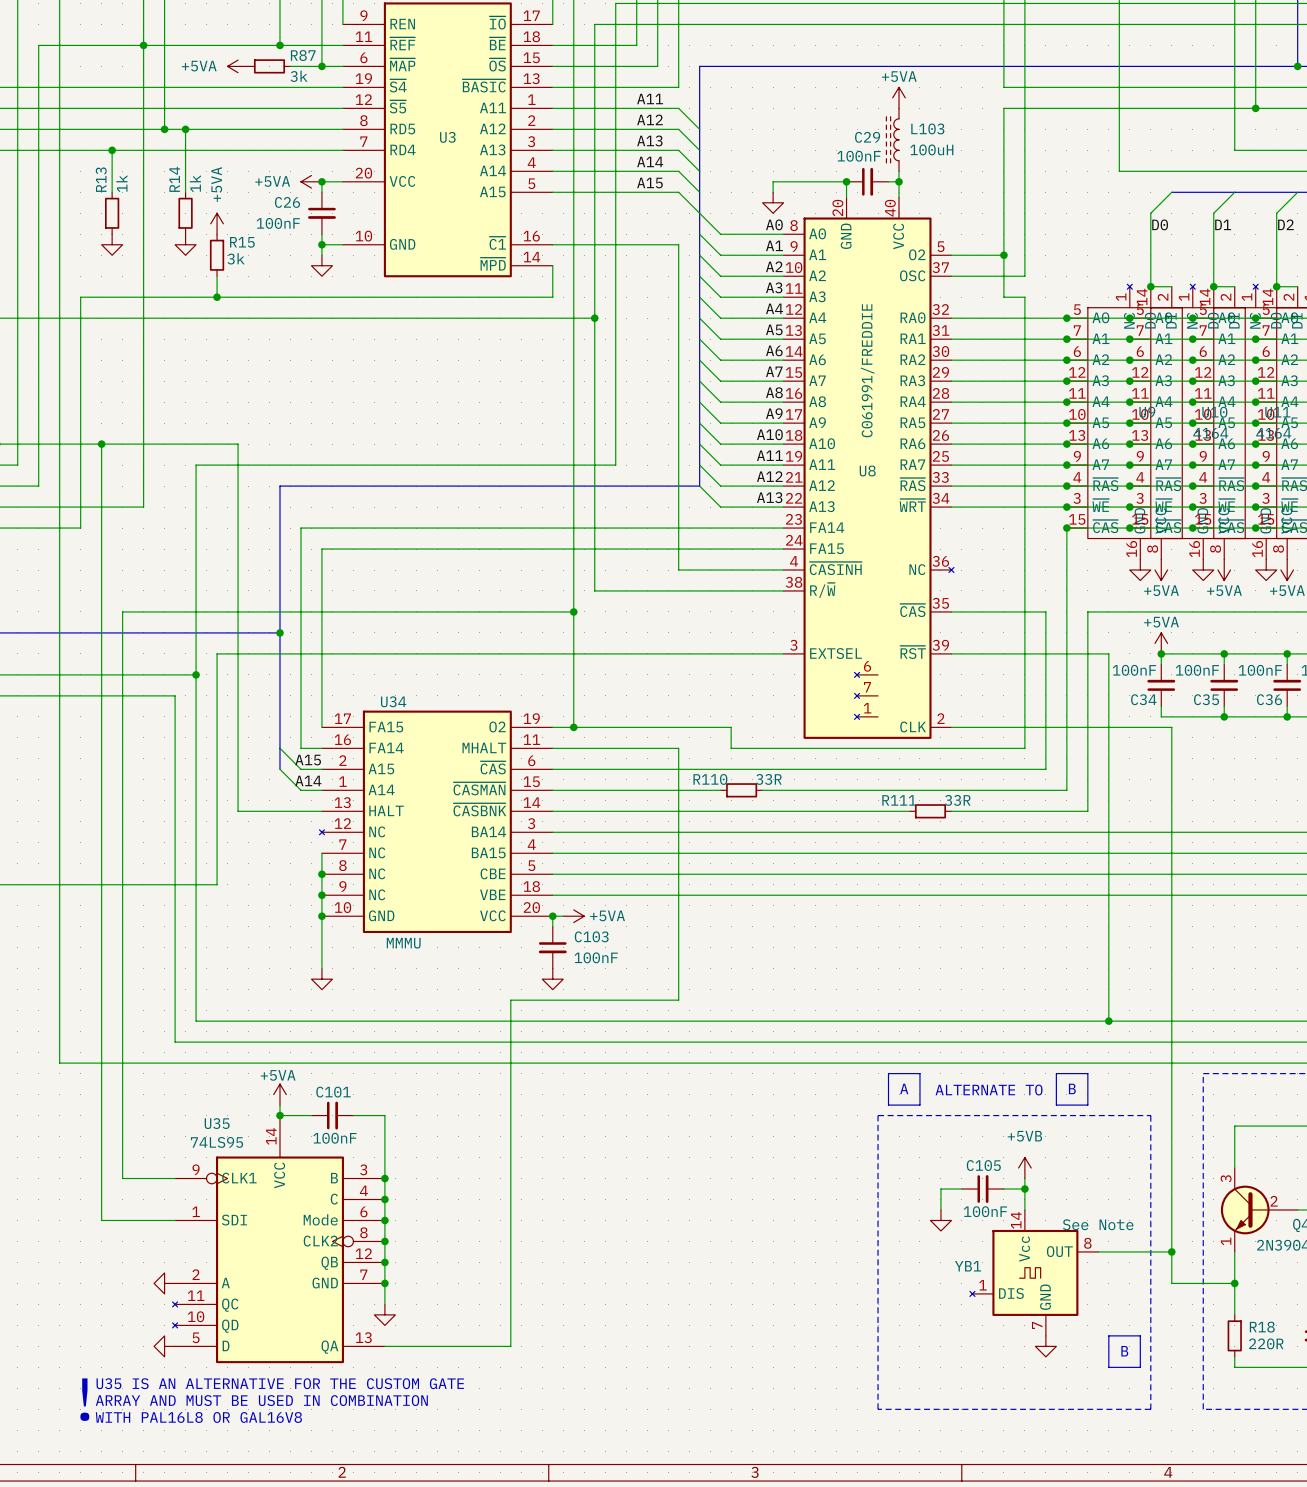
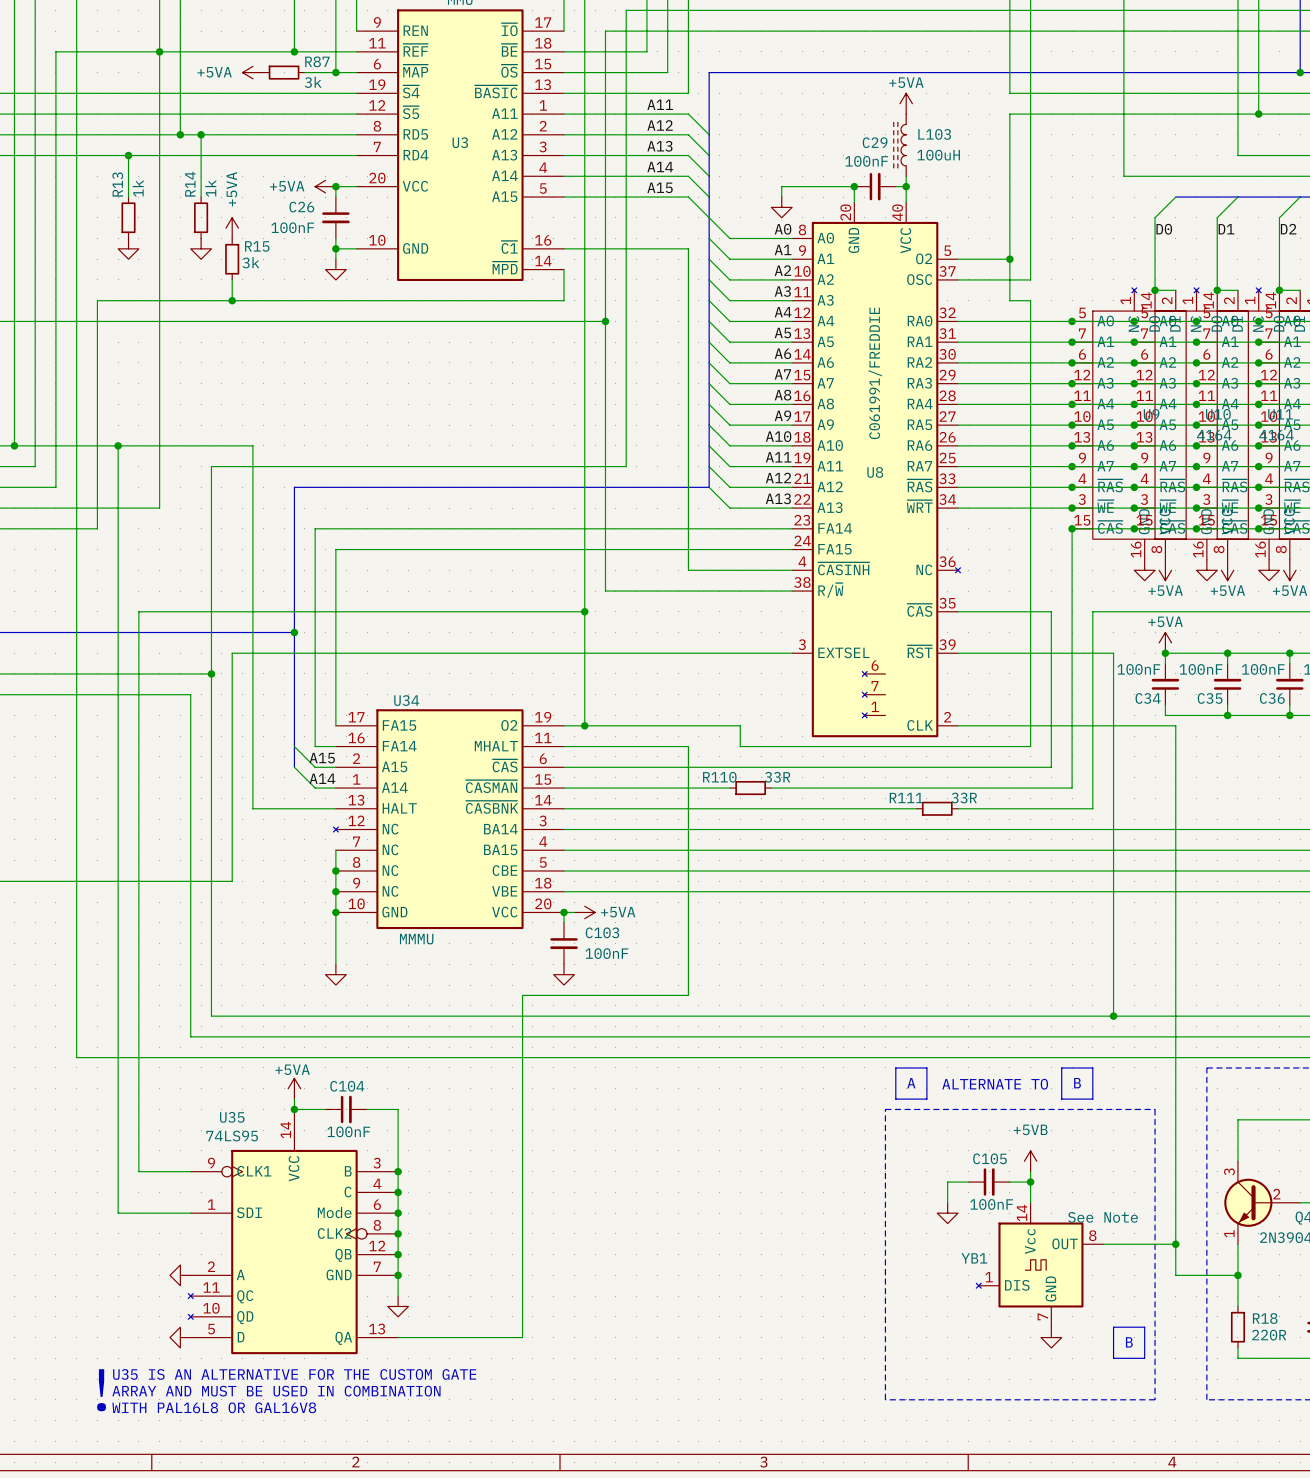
C101 name: C101 (333, 1092) -> C104 (347, 1086)

